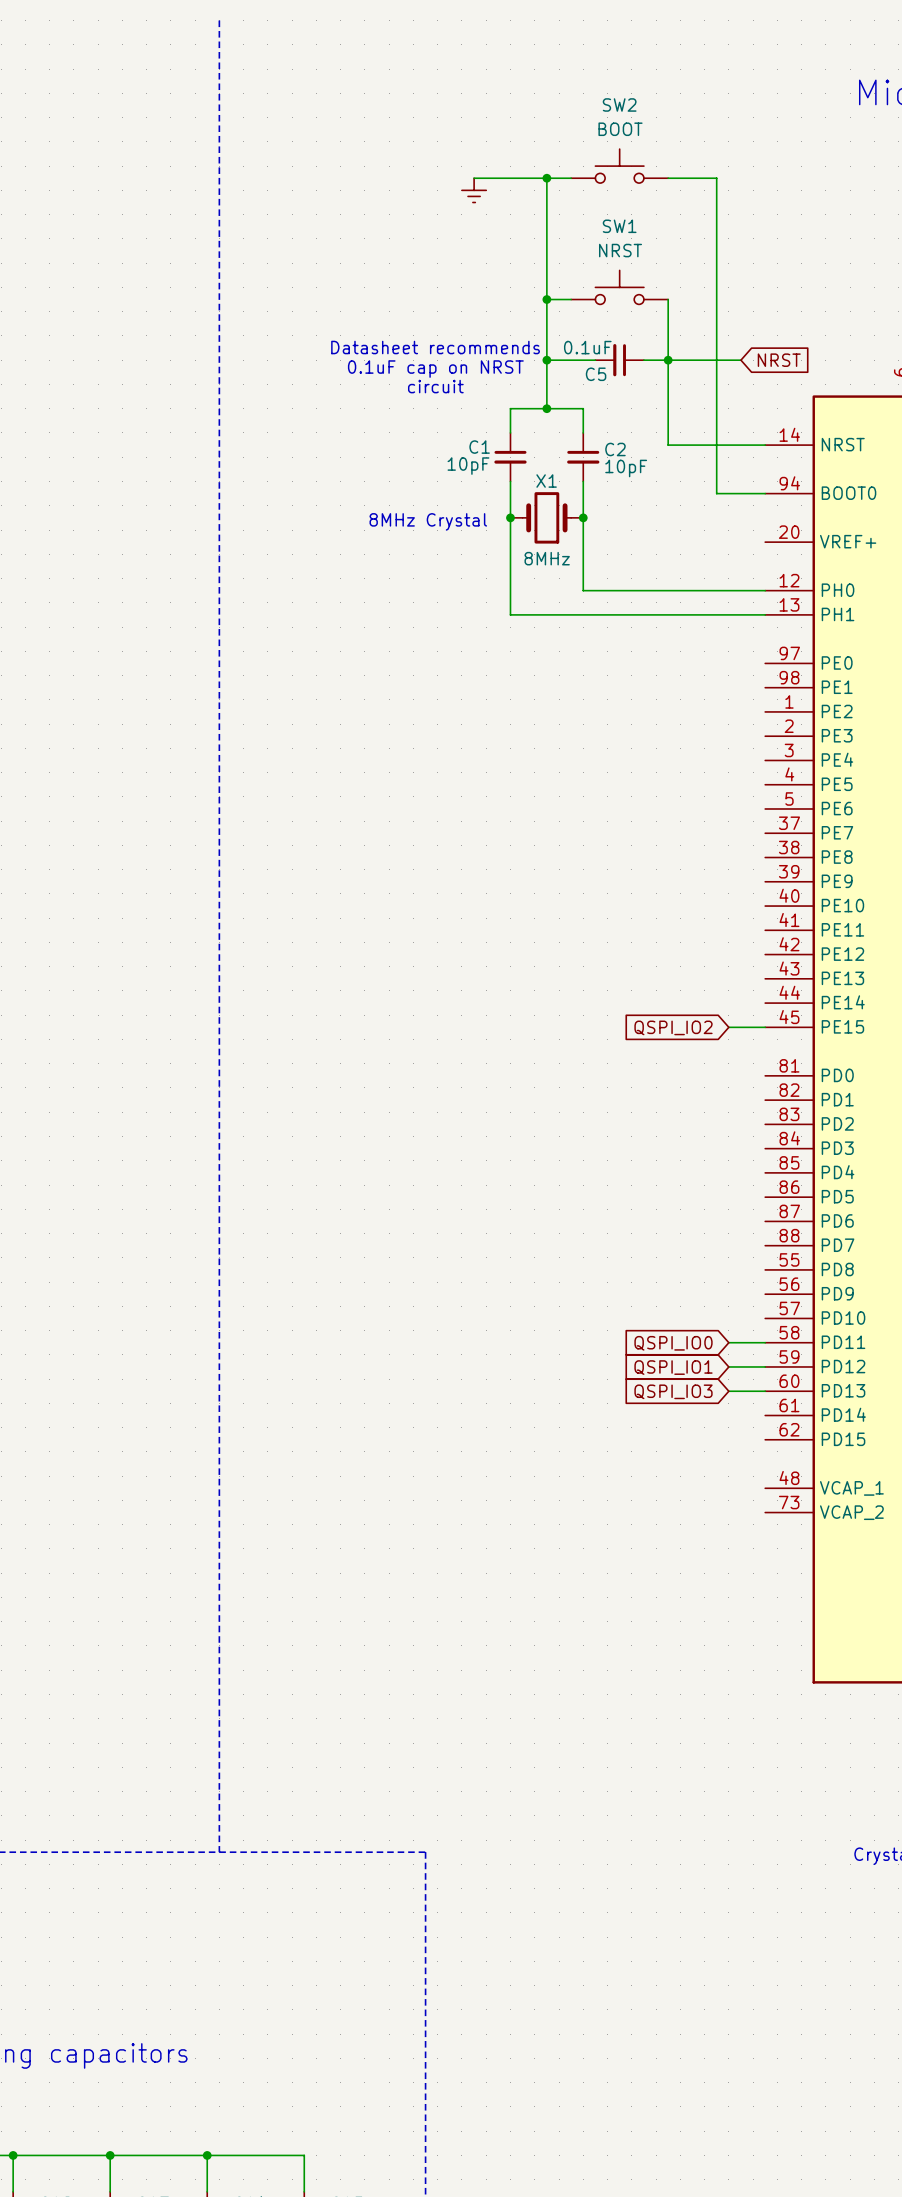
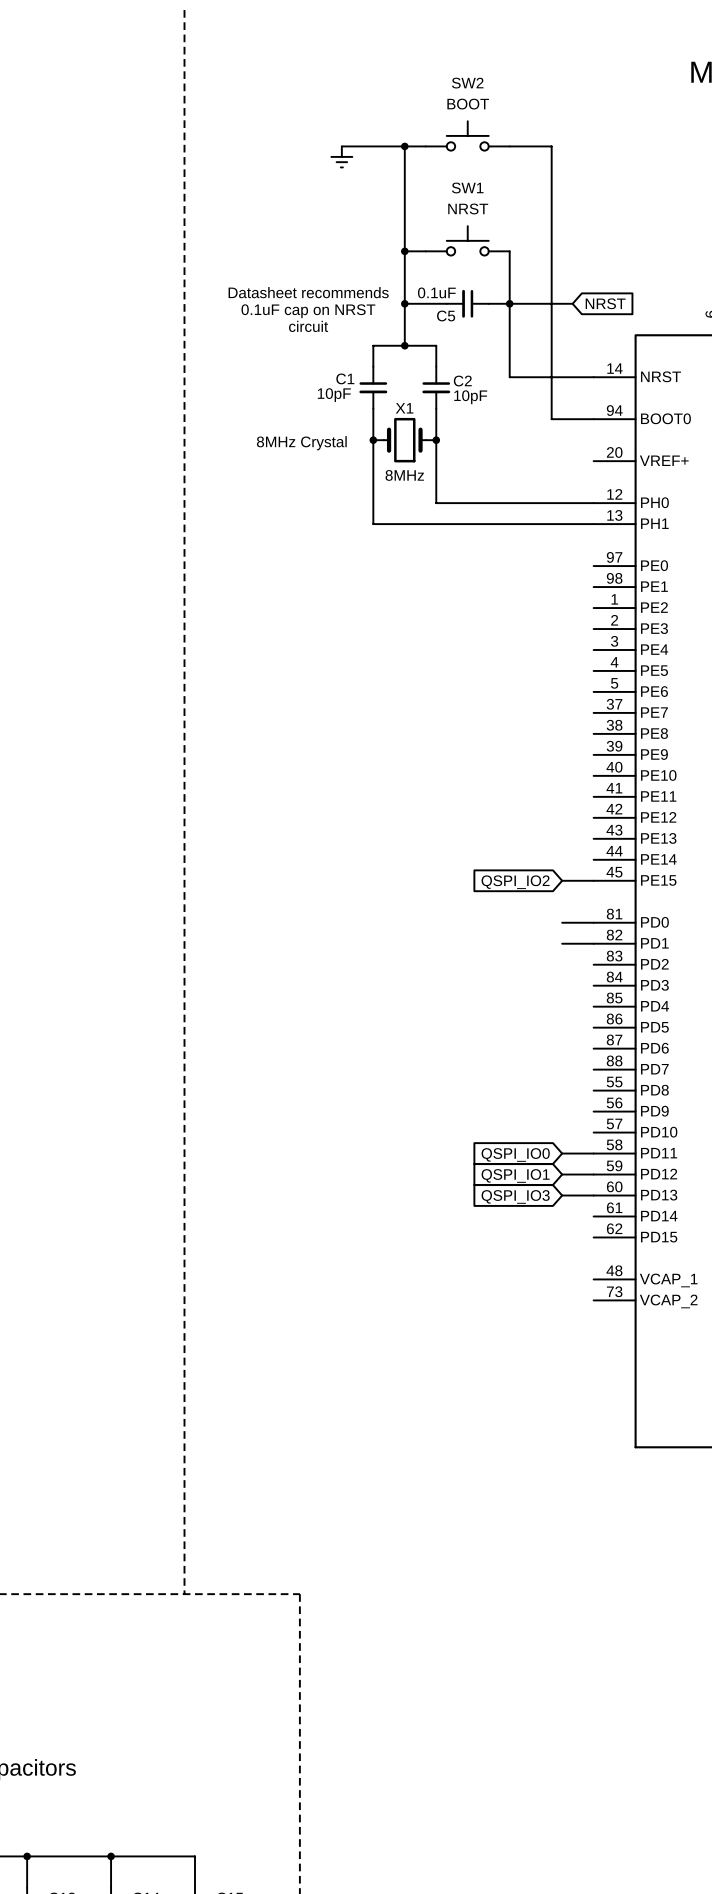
line: (219, 20) (219, 1852) -> (184, 10) (184, 1594)
wire: none -> (562, 922) (593, 922)
wire: none -> (562, 943) (593, 943)

